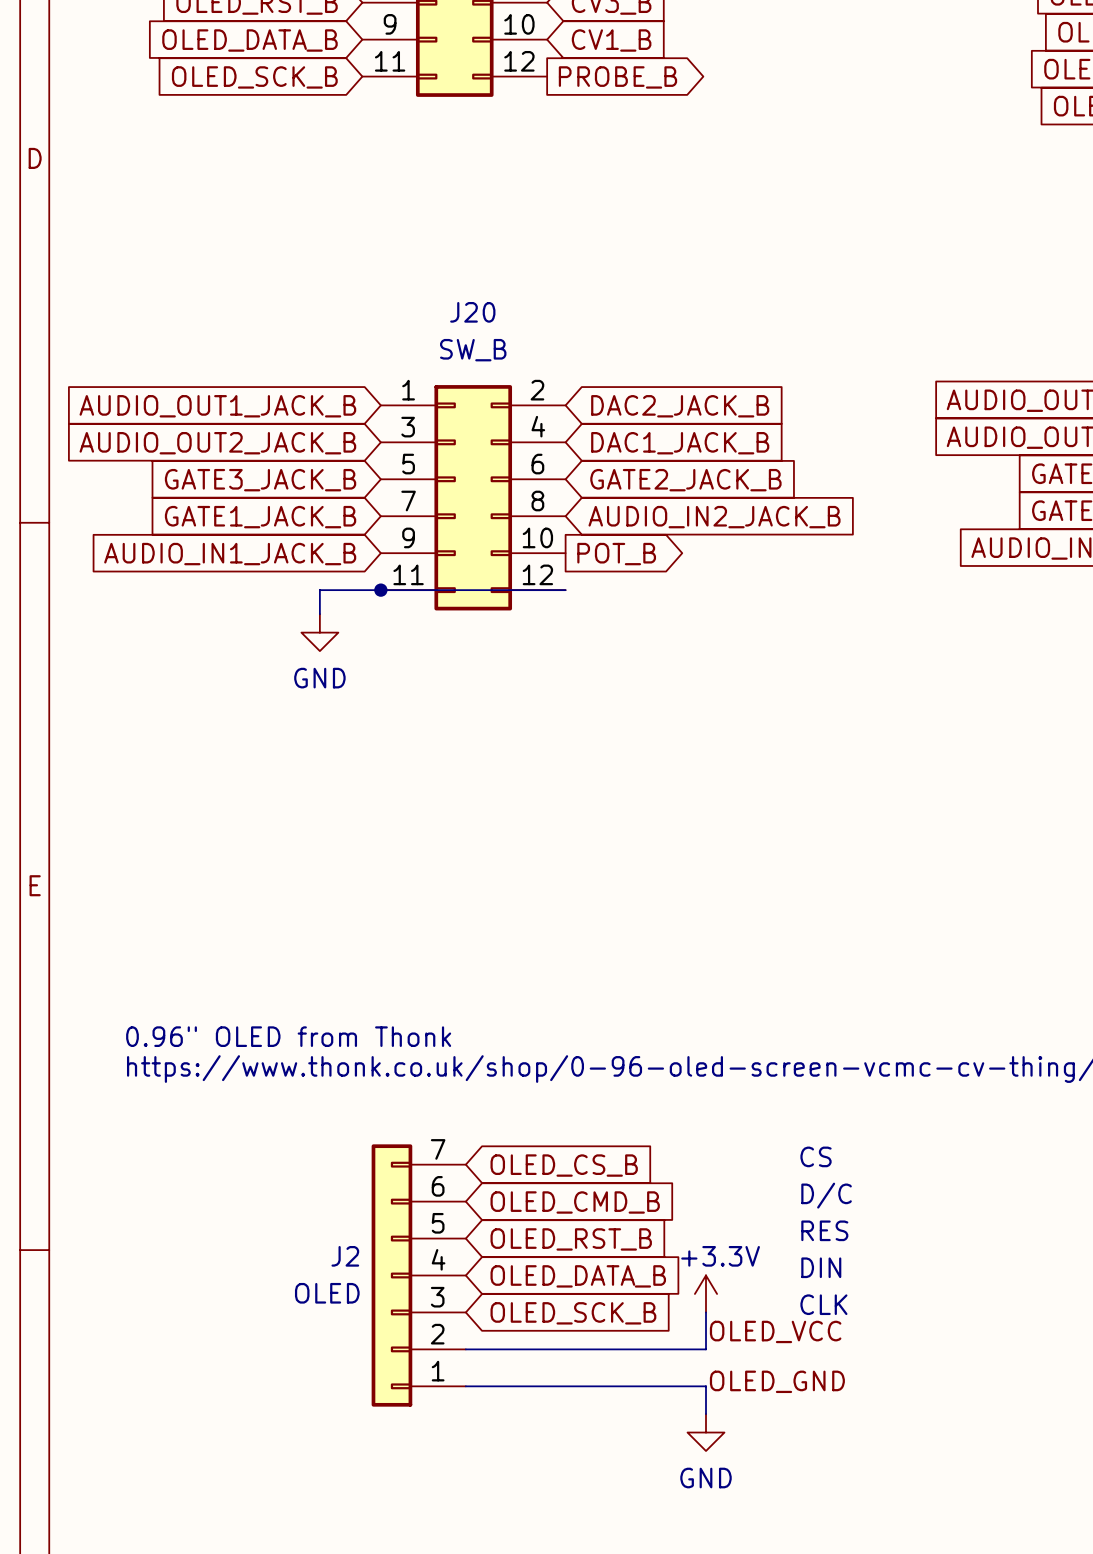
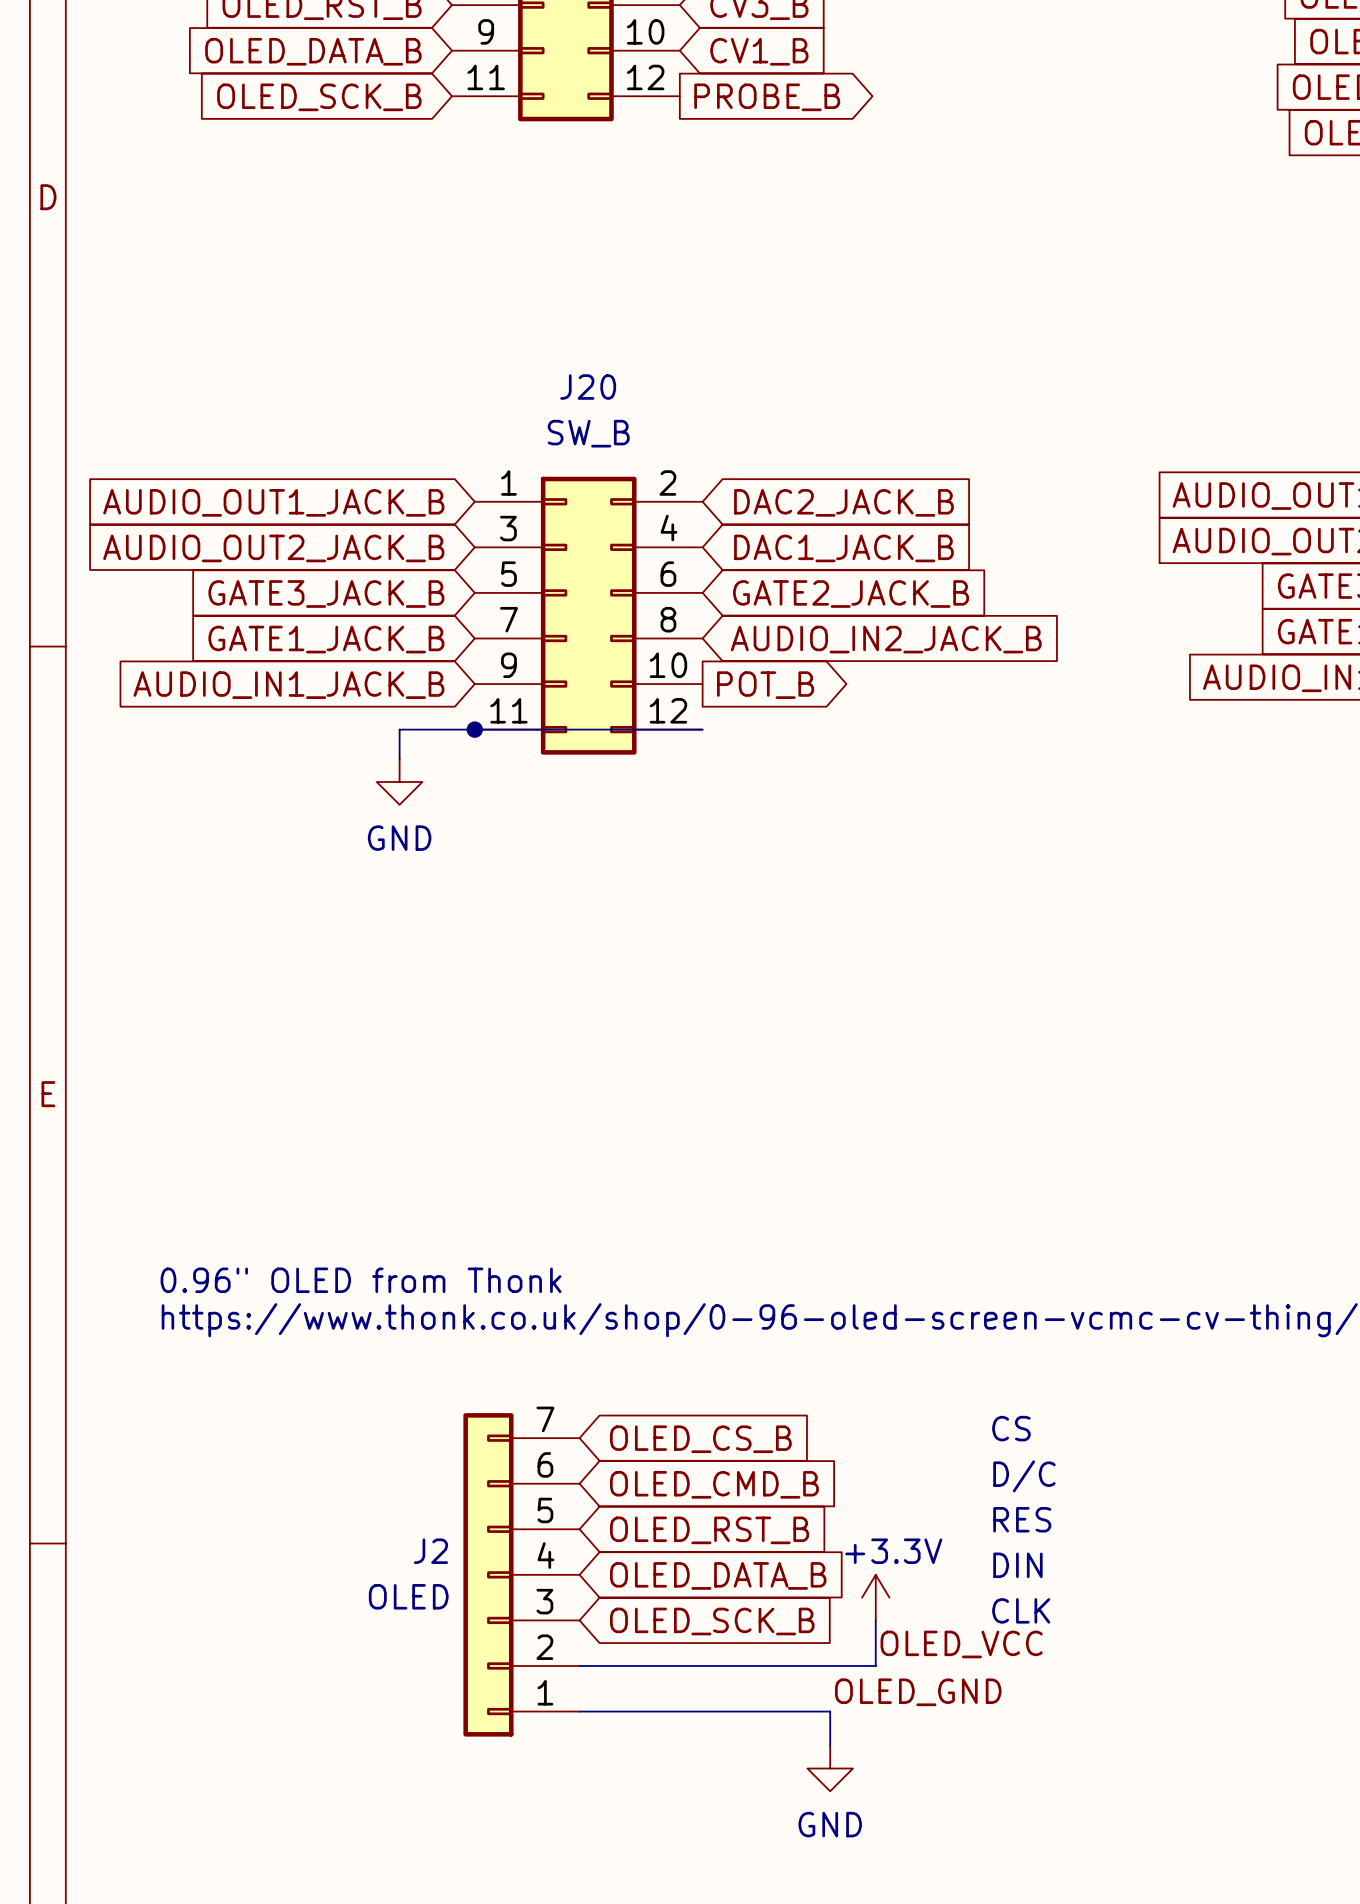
label position: OLED_GND (777, 1381) -> OLED_GND (918, 1692)
wire: (669, 1386) (706, 1386) (706, 1414) -> (830, 1711) (830, 1745)
power symbol position: GND (706, 1432) -> GND (830, 1768)

